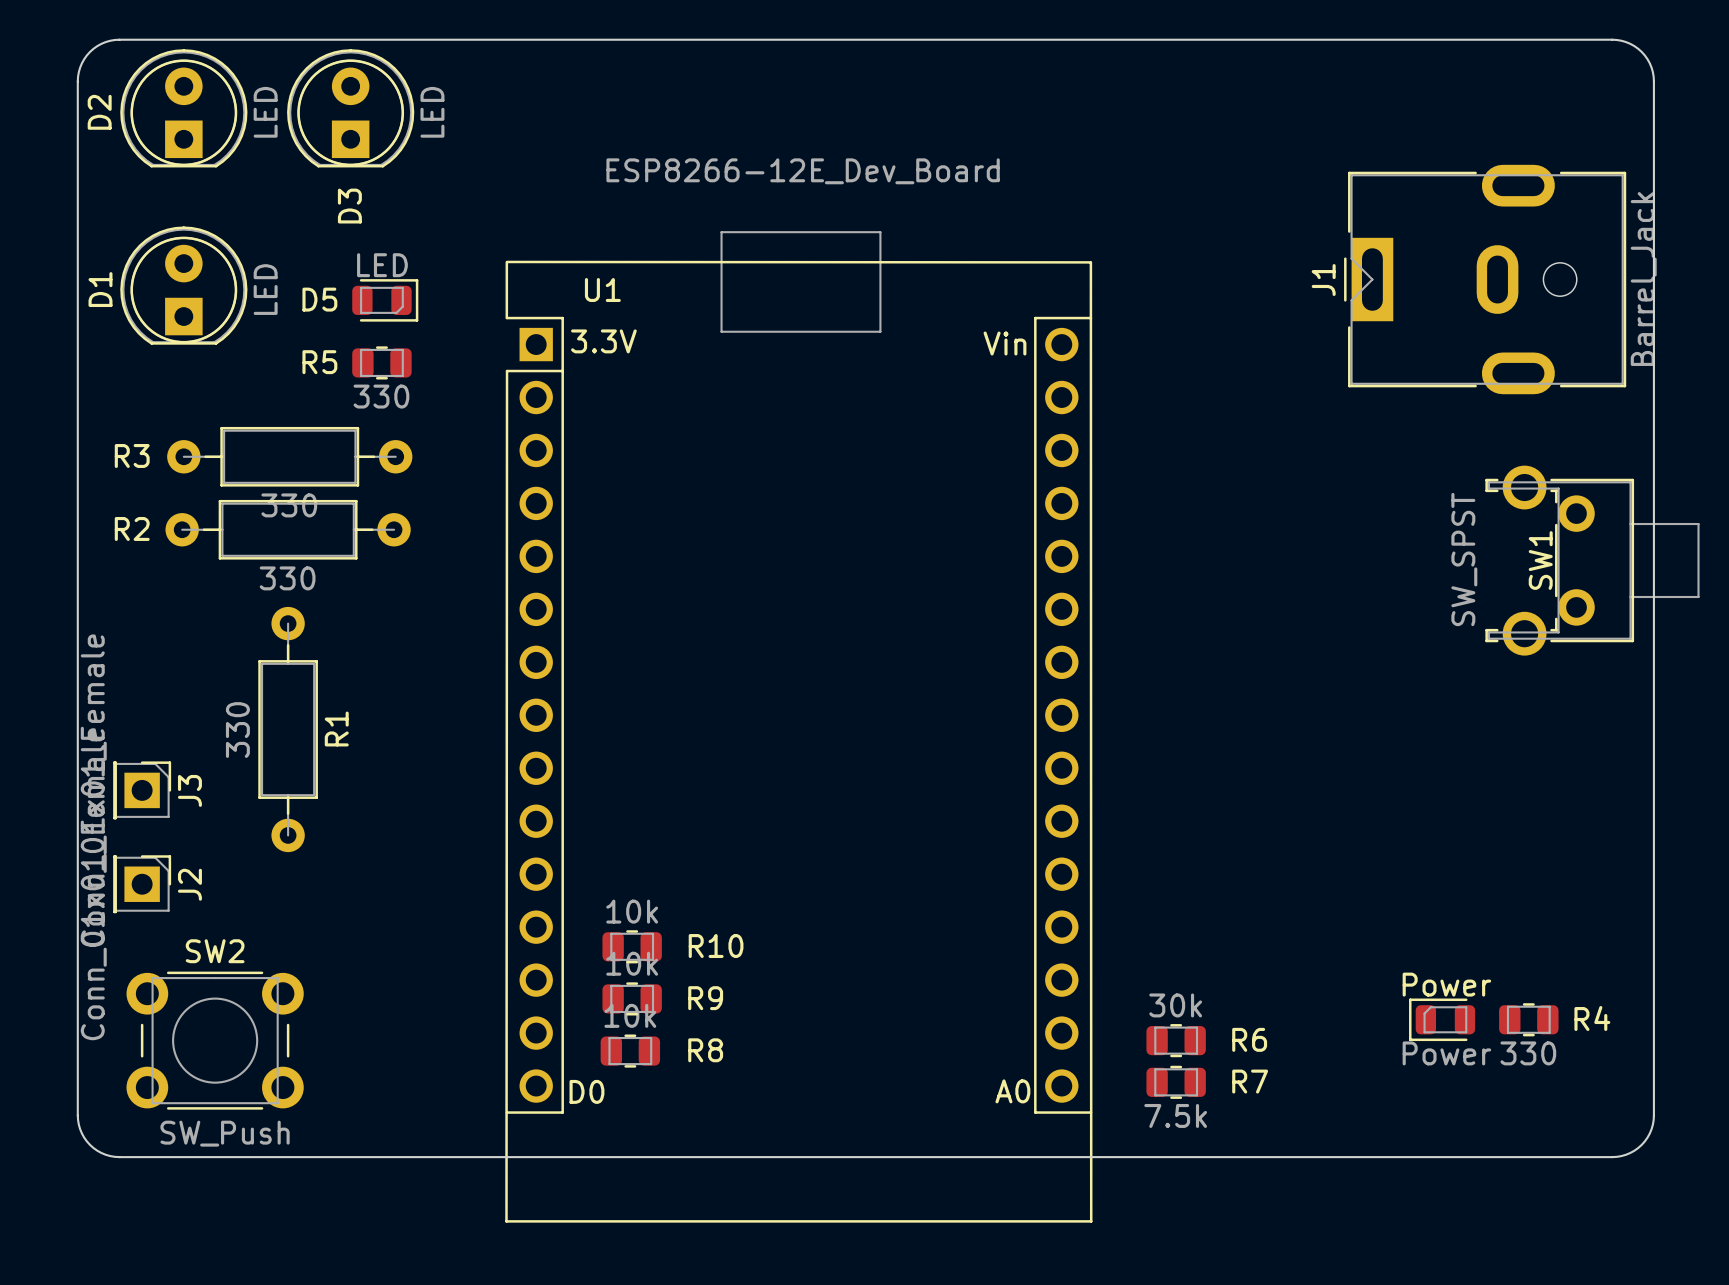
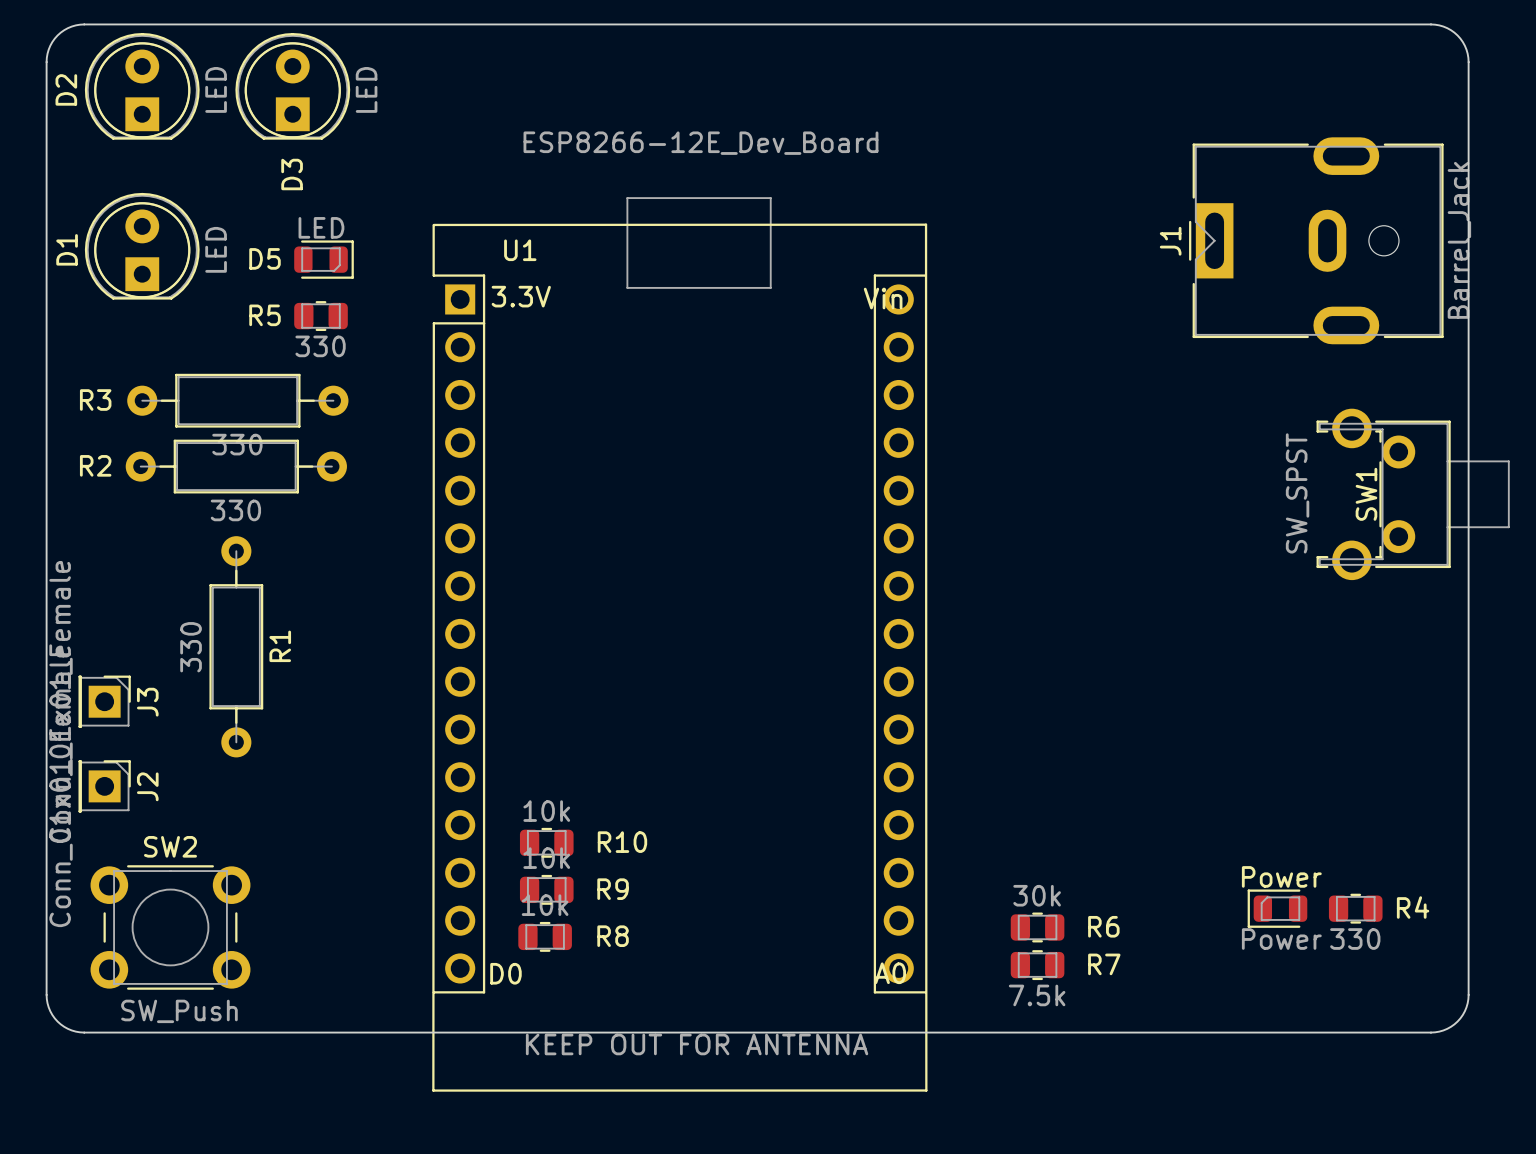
U1 footprint: [505, 231, 1093, 1223] -> [432, 197, 928, 1092]

